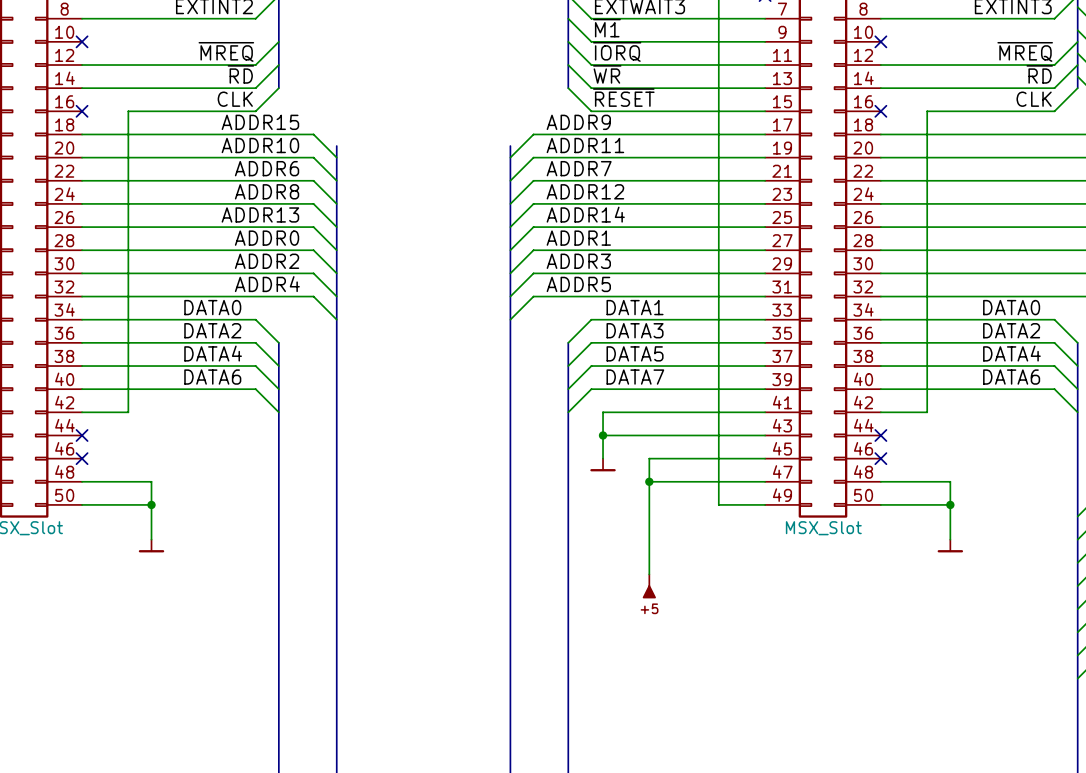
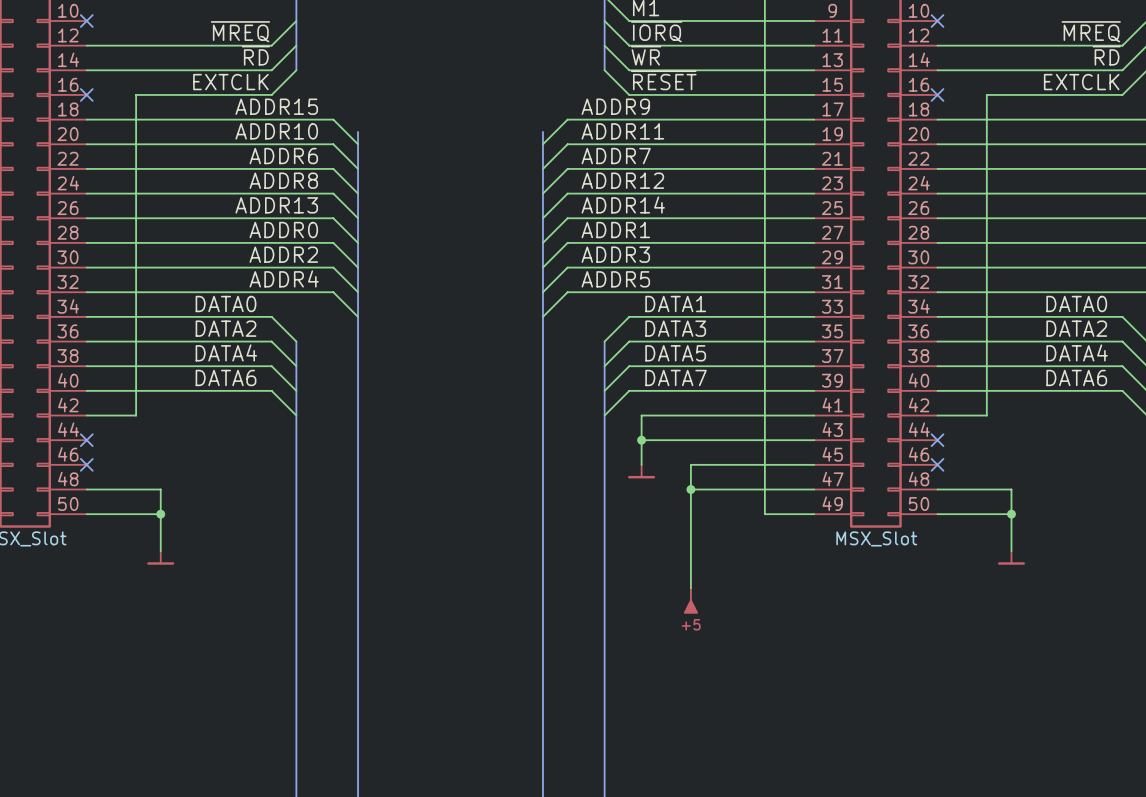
label: CLK (235, 99) -> EXTCLK (230, 82)
label: CLK (1034, 99) -> EXTCLK (1081, 82)

